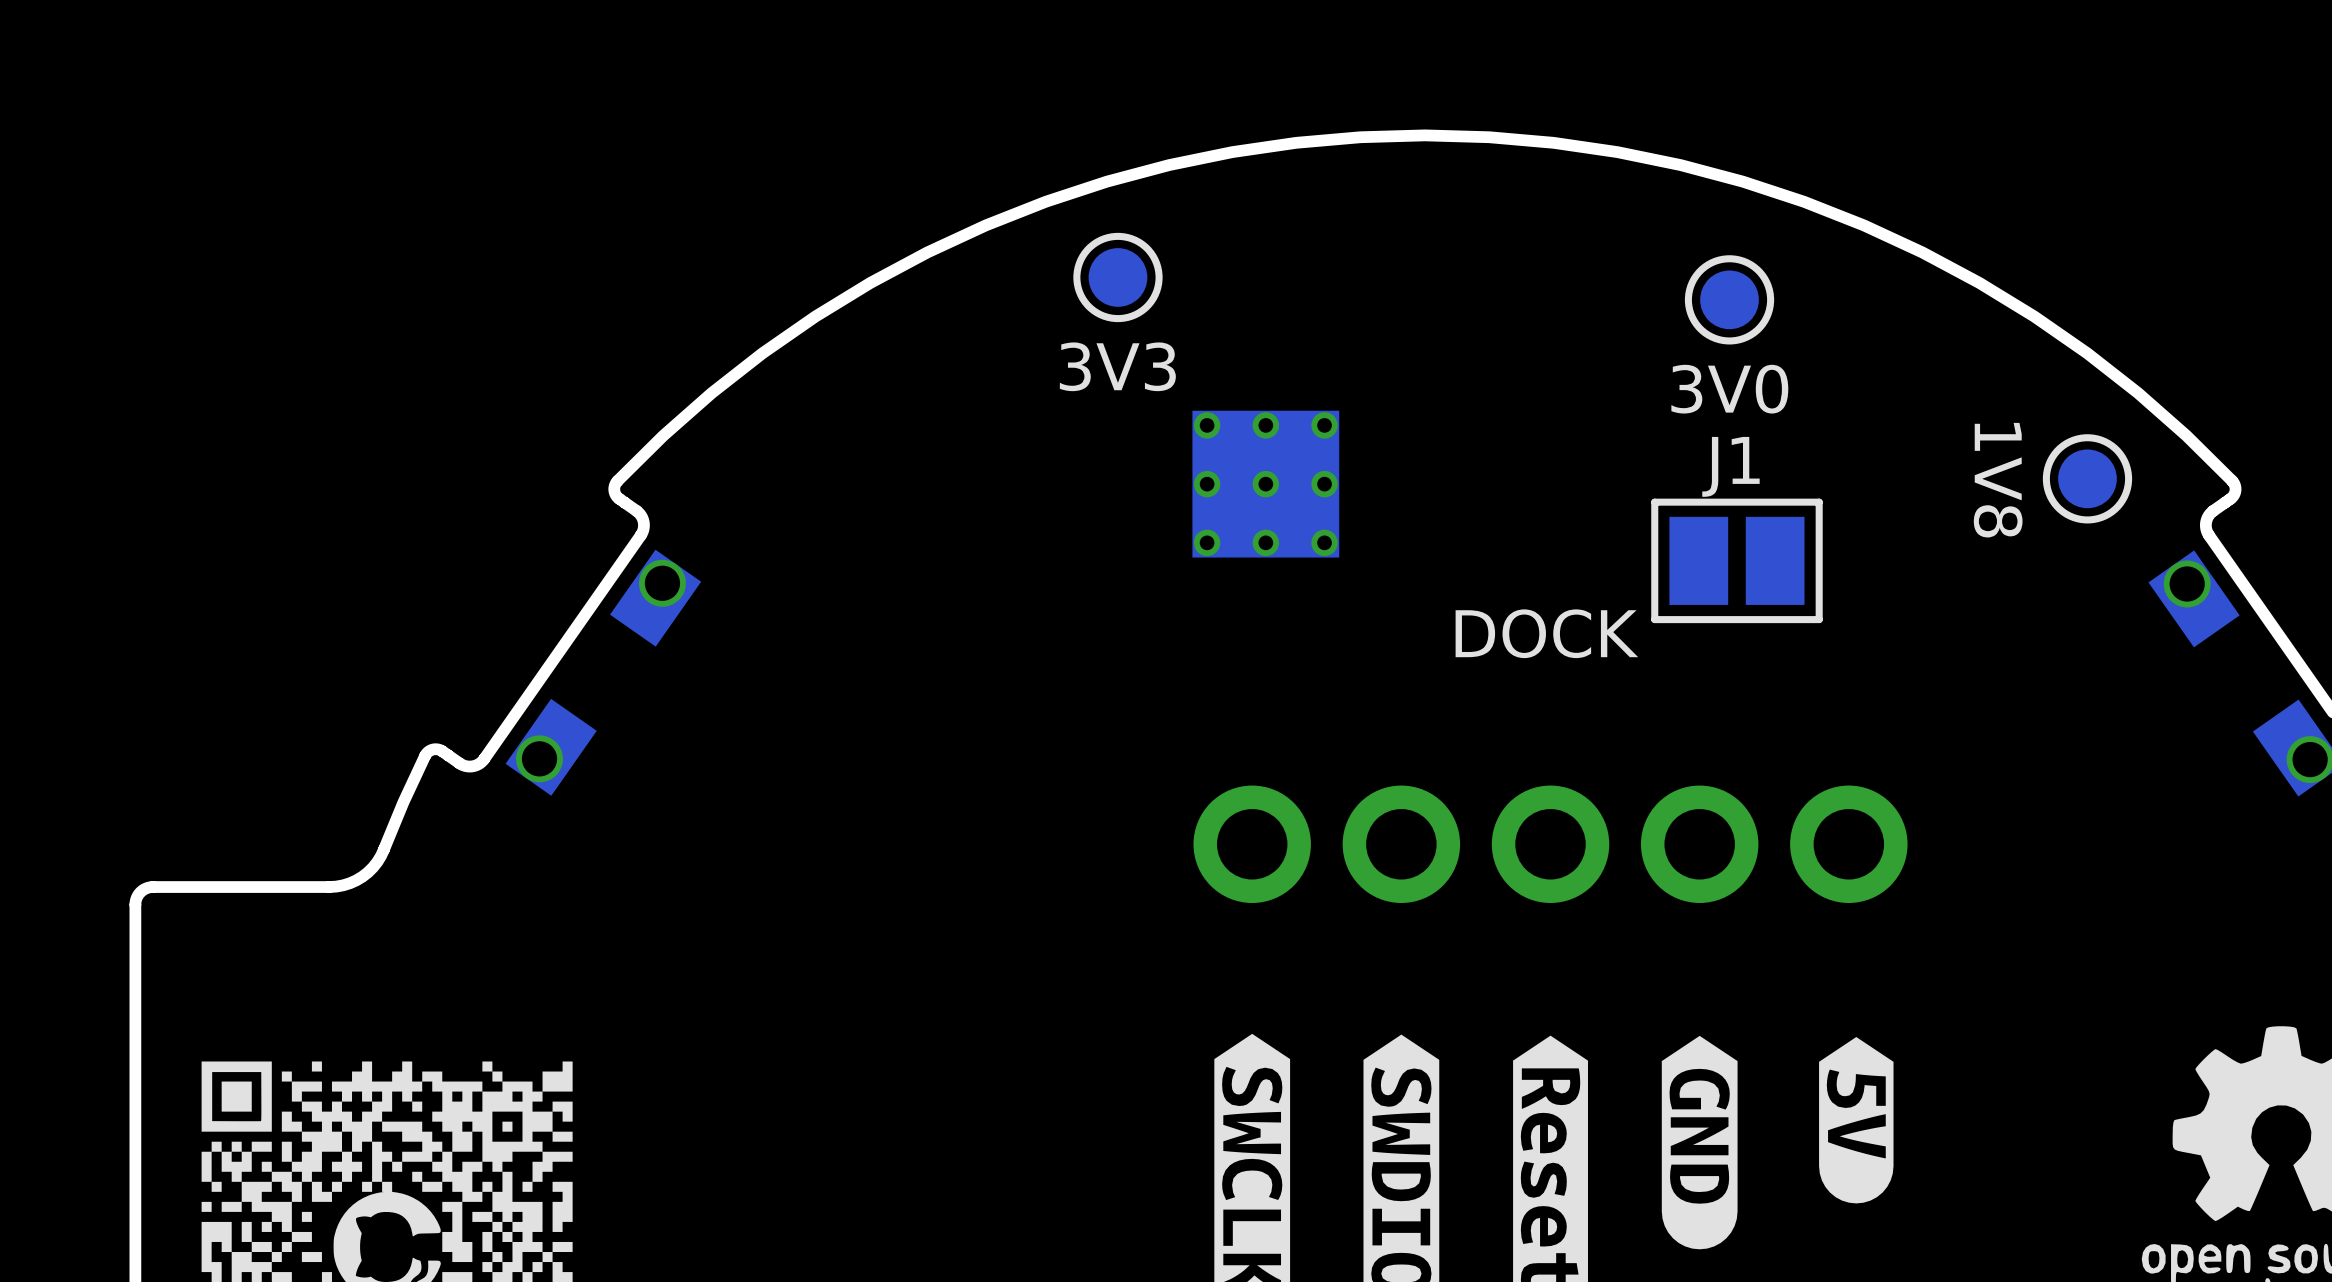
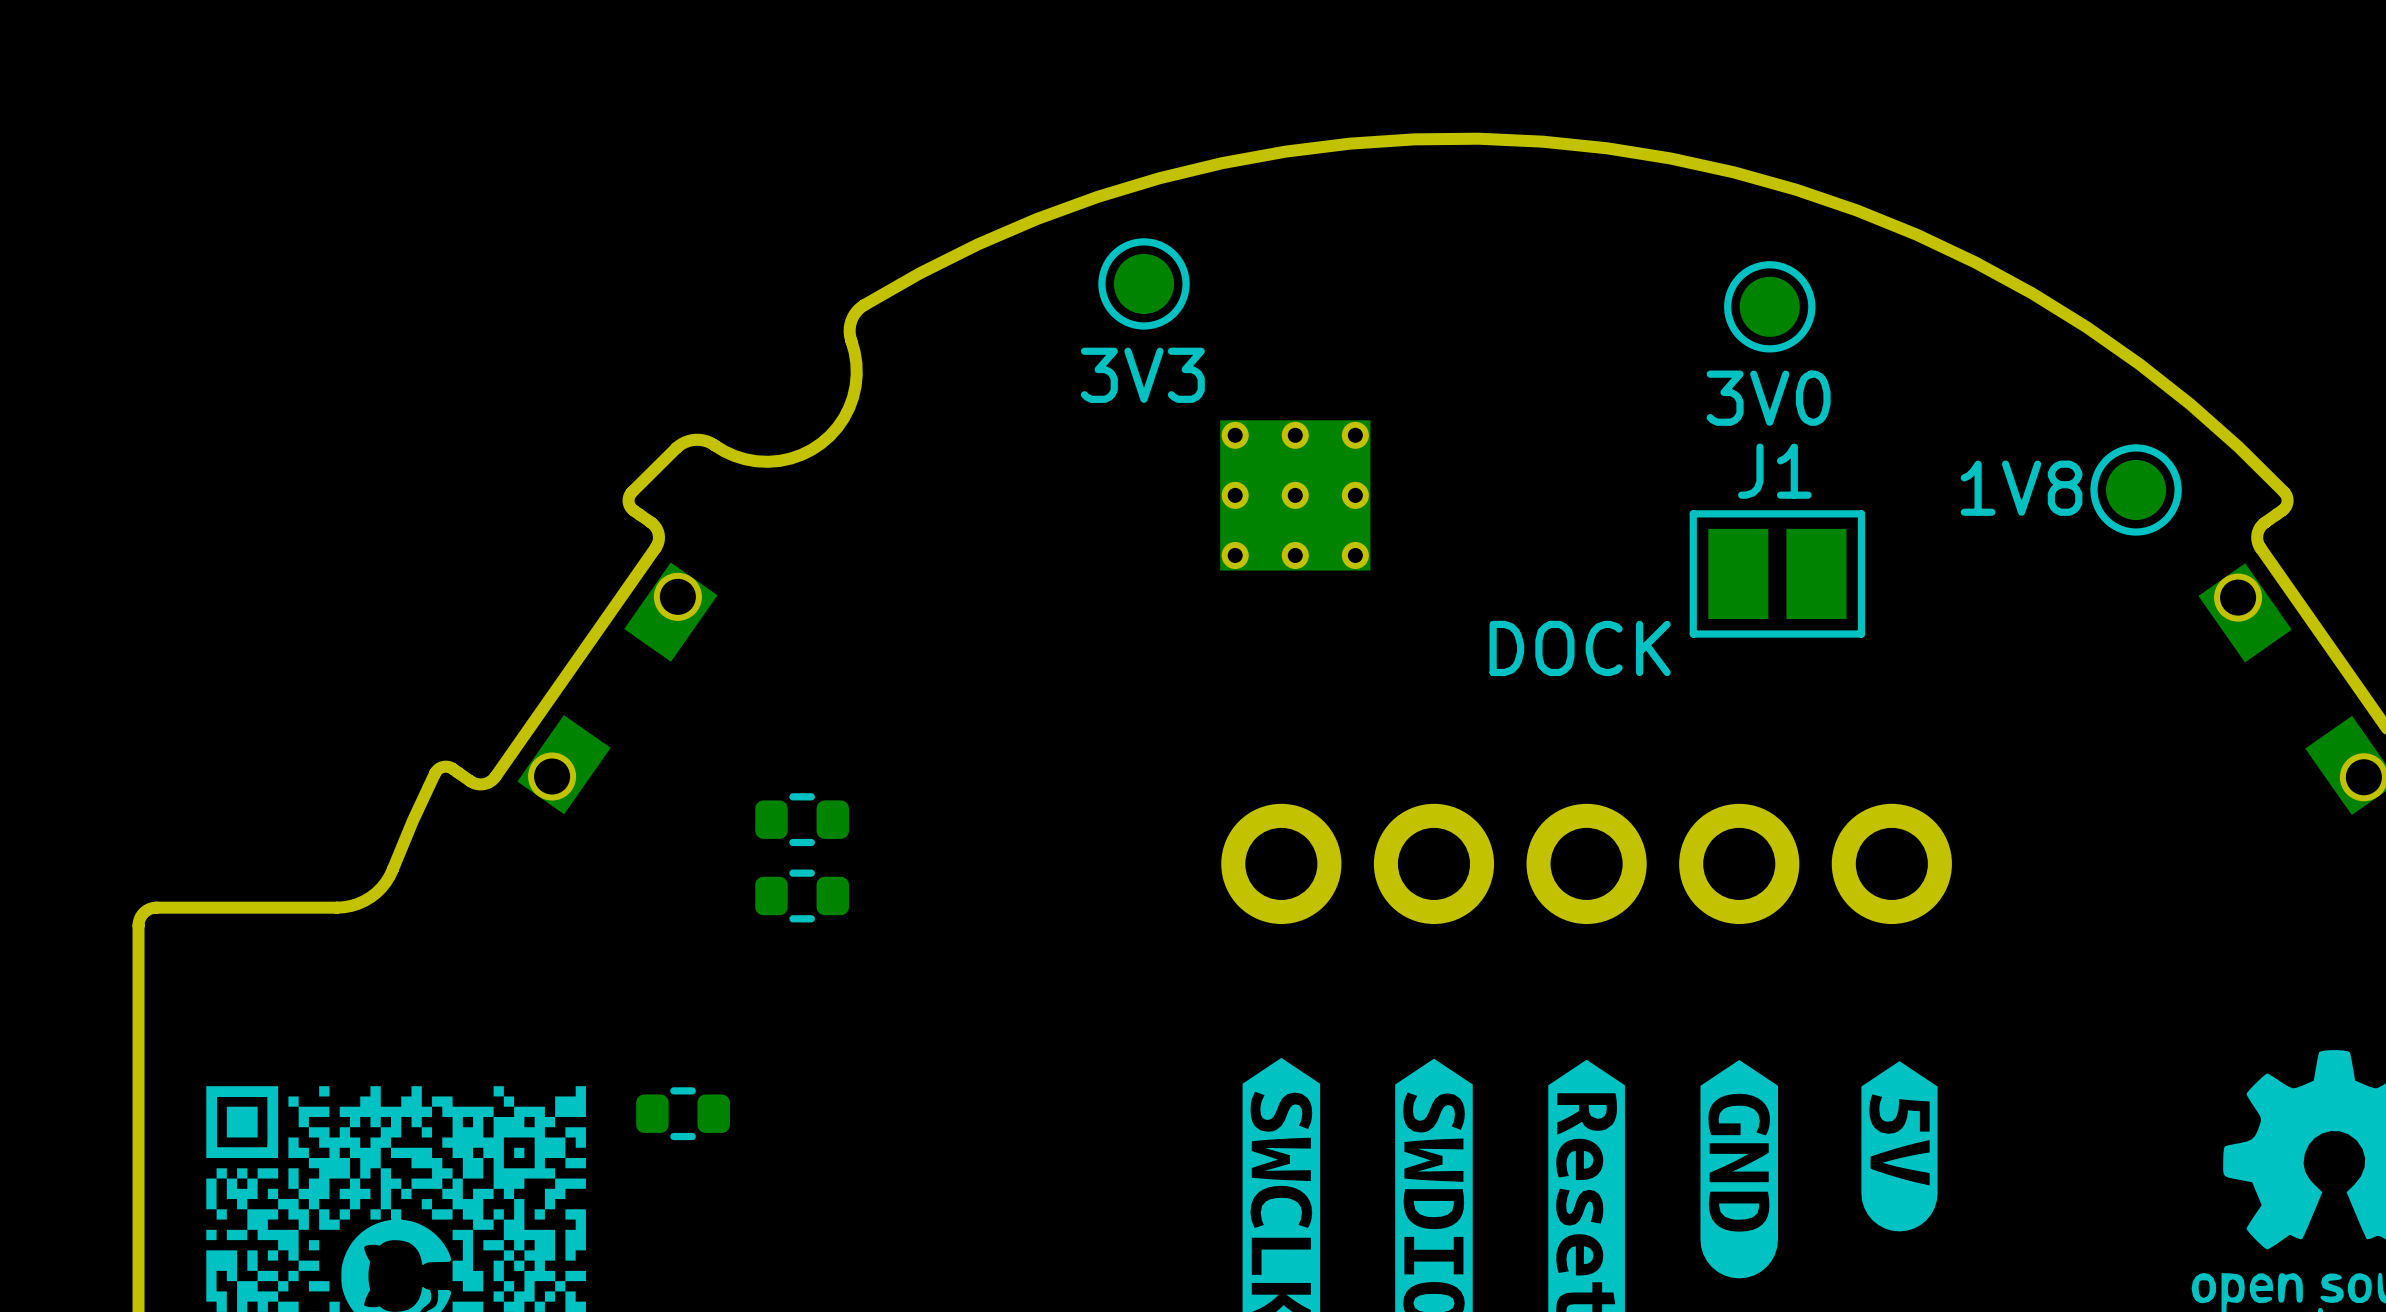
part value rotation: 0° (1998, 480) -> 90° counterclockwise (2021, 488)
board edge: (2232, 481) (2186, 435) (2138, 393) (2087, 353) (2034, 316) (1979, 282) (1922, 252) (1864, 225) (1804, 201) (1742, 181) (1680, 165) (1617, 152) (1553, 142) (1489, 137) (1424, 135) (1360, 137) (1296, 142) (1232, 152) (1169, 165) (1106, 181) (1045, 201) (985, 225) (927, 252) (870, 282) (815, 316) (762, 353) (711, 393) (663, 435) (617, 481) -> (2284, 492) (2238, 446) (2190, 404) (2139, 364) (2086, 327) (2031, 293) (1975, 262) (1916, 234) (1857, 210) (1795, 189) (1733, 172) (1670, 158) (1607, 148) (1542, 141) (1478, 138) (1414, 139) (1349, 143) (1285, 151) (1222, 163) (1159, 178) (1097, 196) (1037, 218) (977, 244) (920, 273) (858, 309) (852, 317) (849, 327) (856, 363) (853, 397) (837, 427) (821, 443) (801, 454) (768, 461) (734, 455) (705, 440) (688, 441) (676, 447) (631, 492)
part: none -> (802, 819)
part: none -> (802, 895)
part: none -> (683, 1113)

